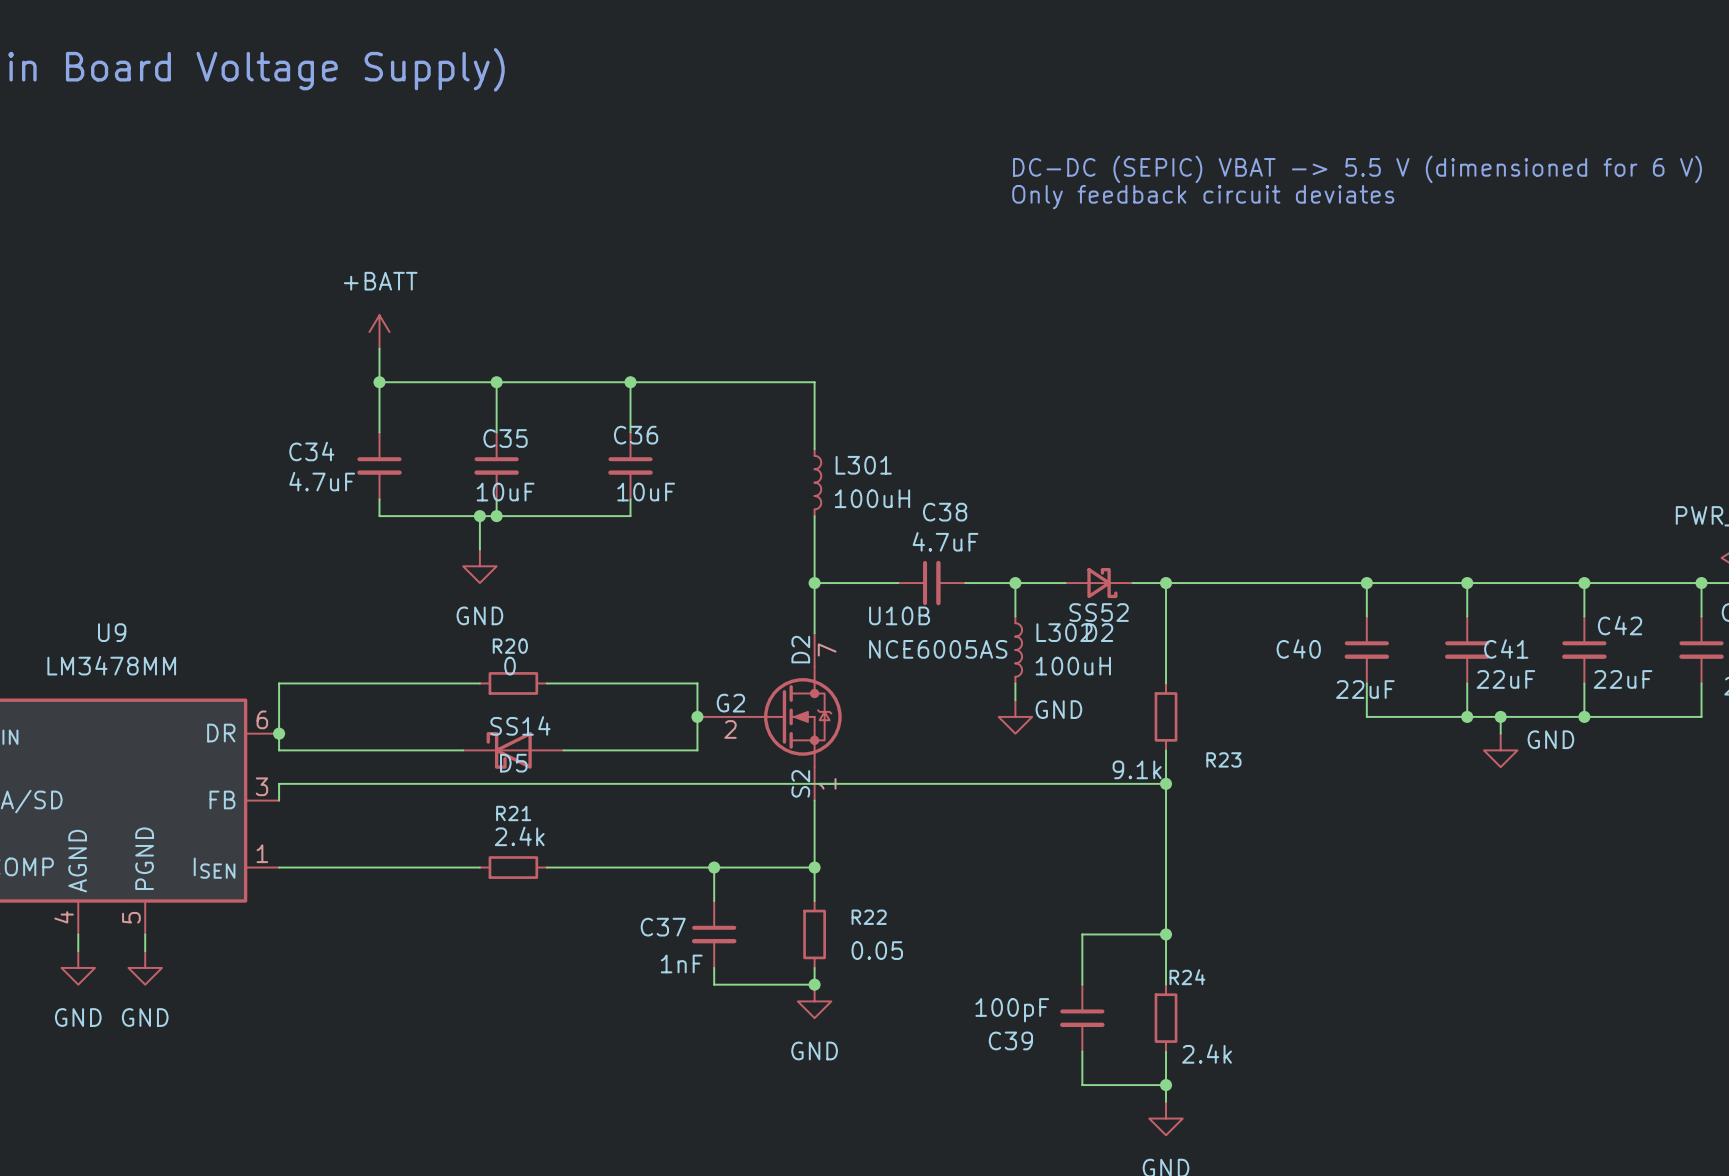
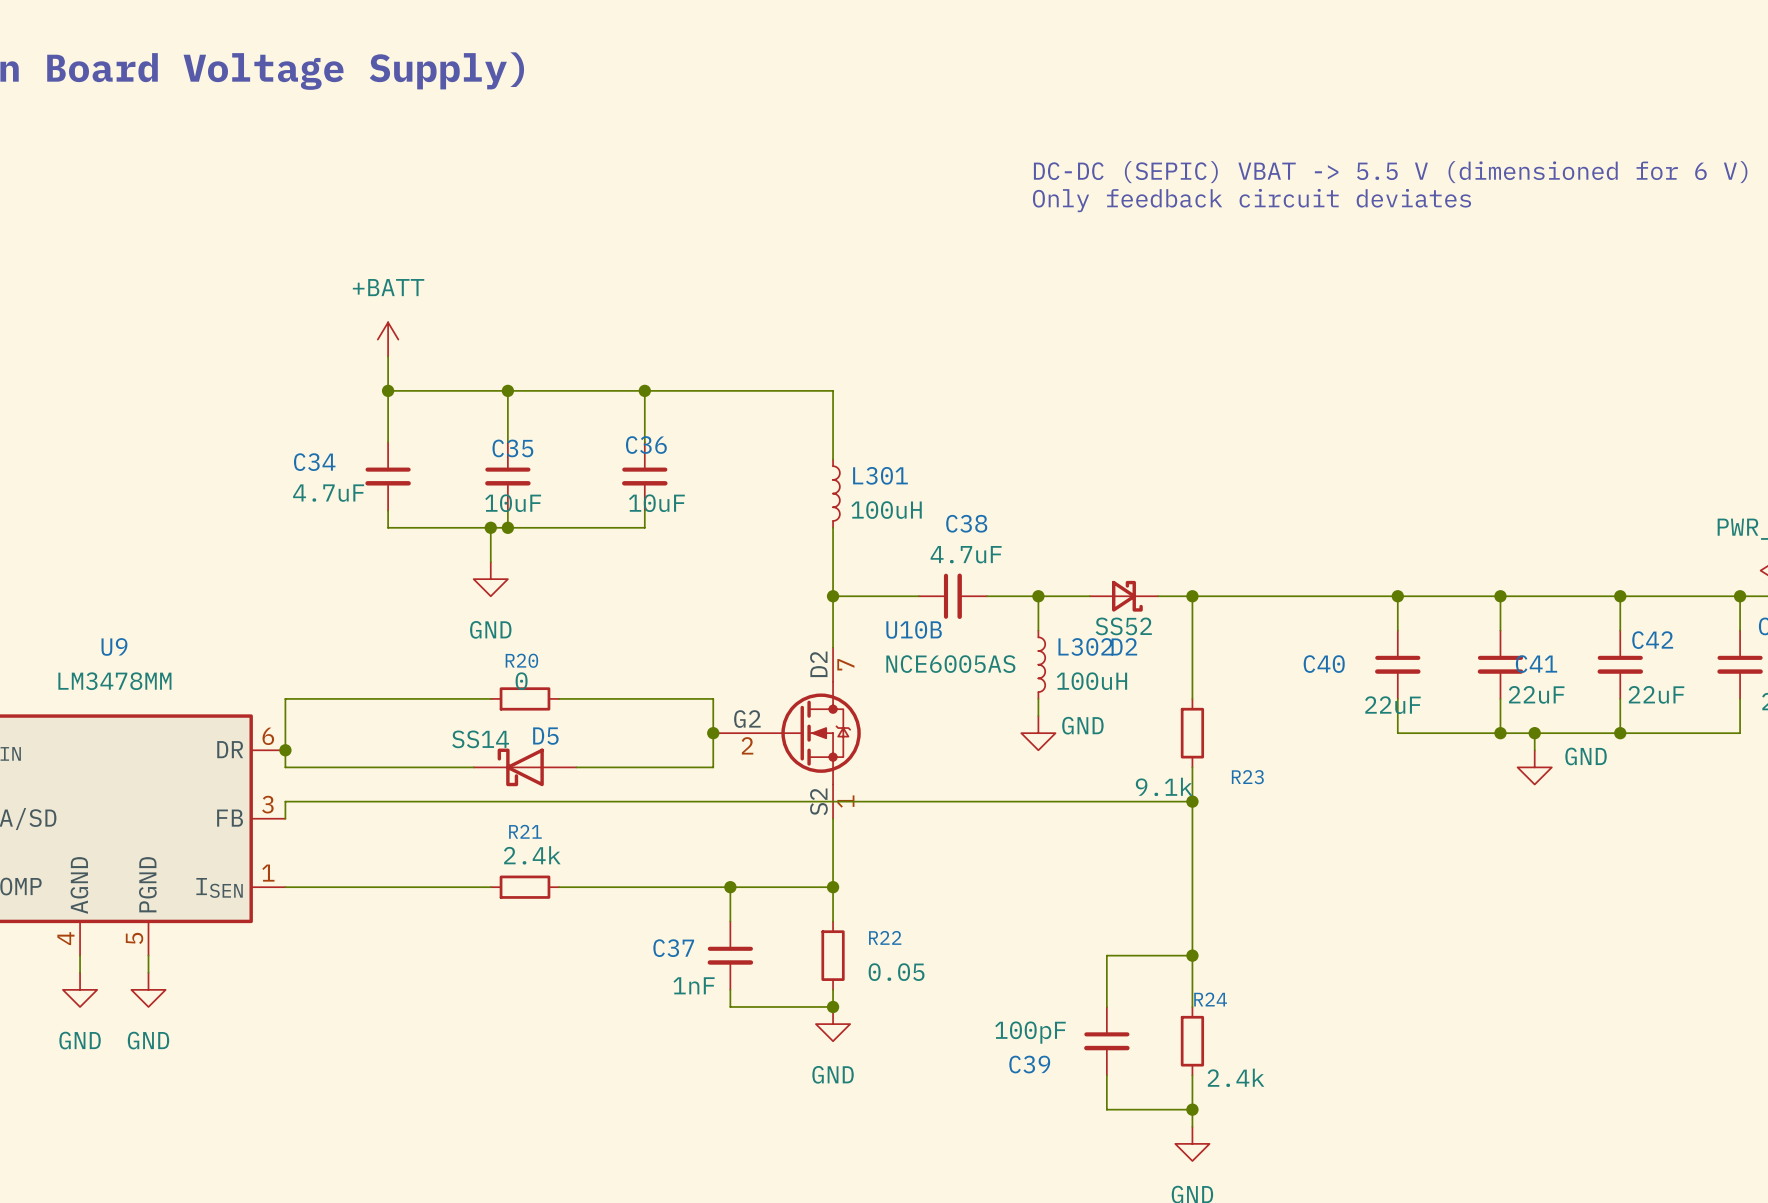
D5 value position: SS14 (520, 725) -> SS14 (480, 739)
D5 name position: D5 (513, 763) -> D5 (545, 736)

